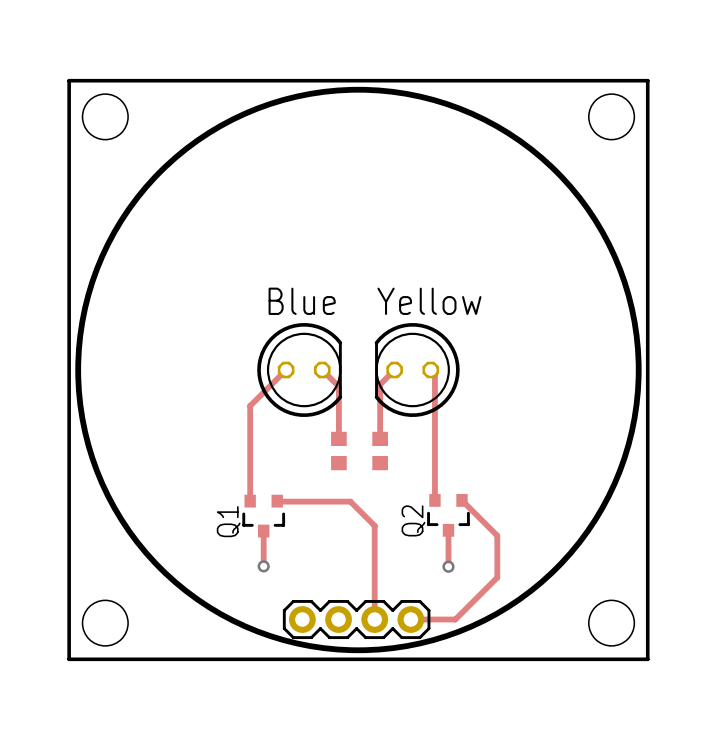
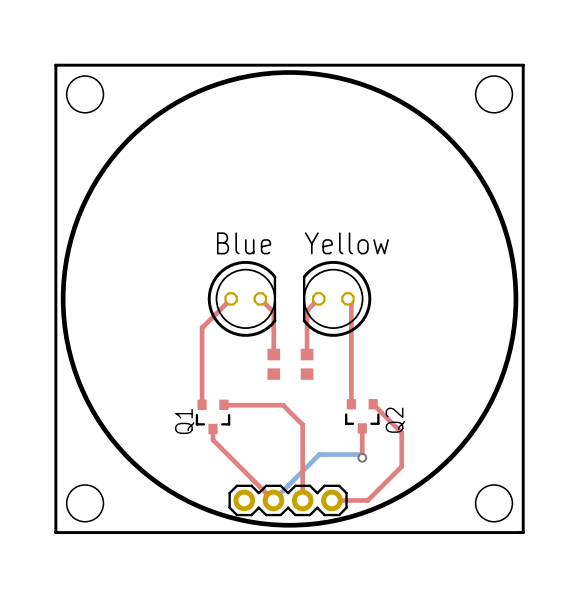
Q2 name position: Q2 (413, 520) -> Q2 (395, 420)
top track: (263, 544) (263, 566) -> (213, 439) (273, 500)
bottom track: none -> (361, 454) (319, 454) (273, 500)
via: (263, 566) -> none

